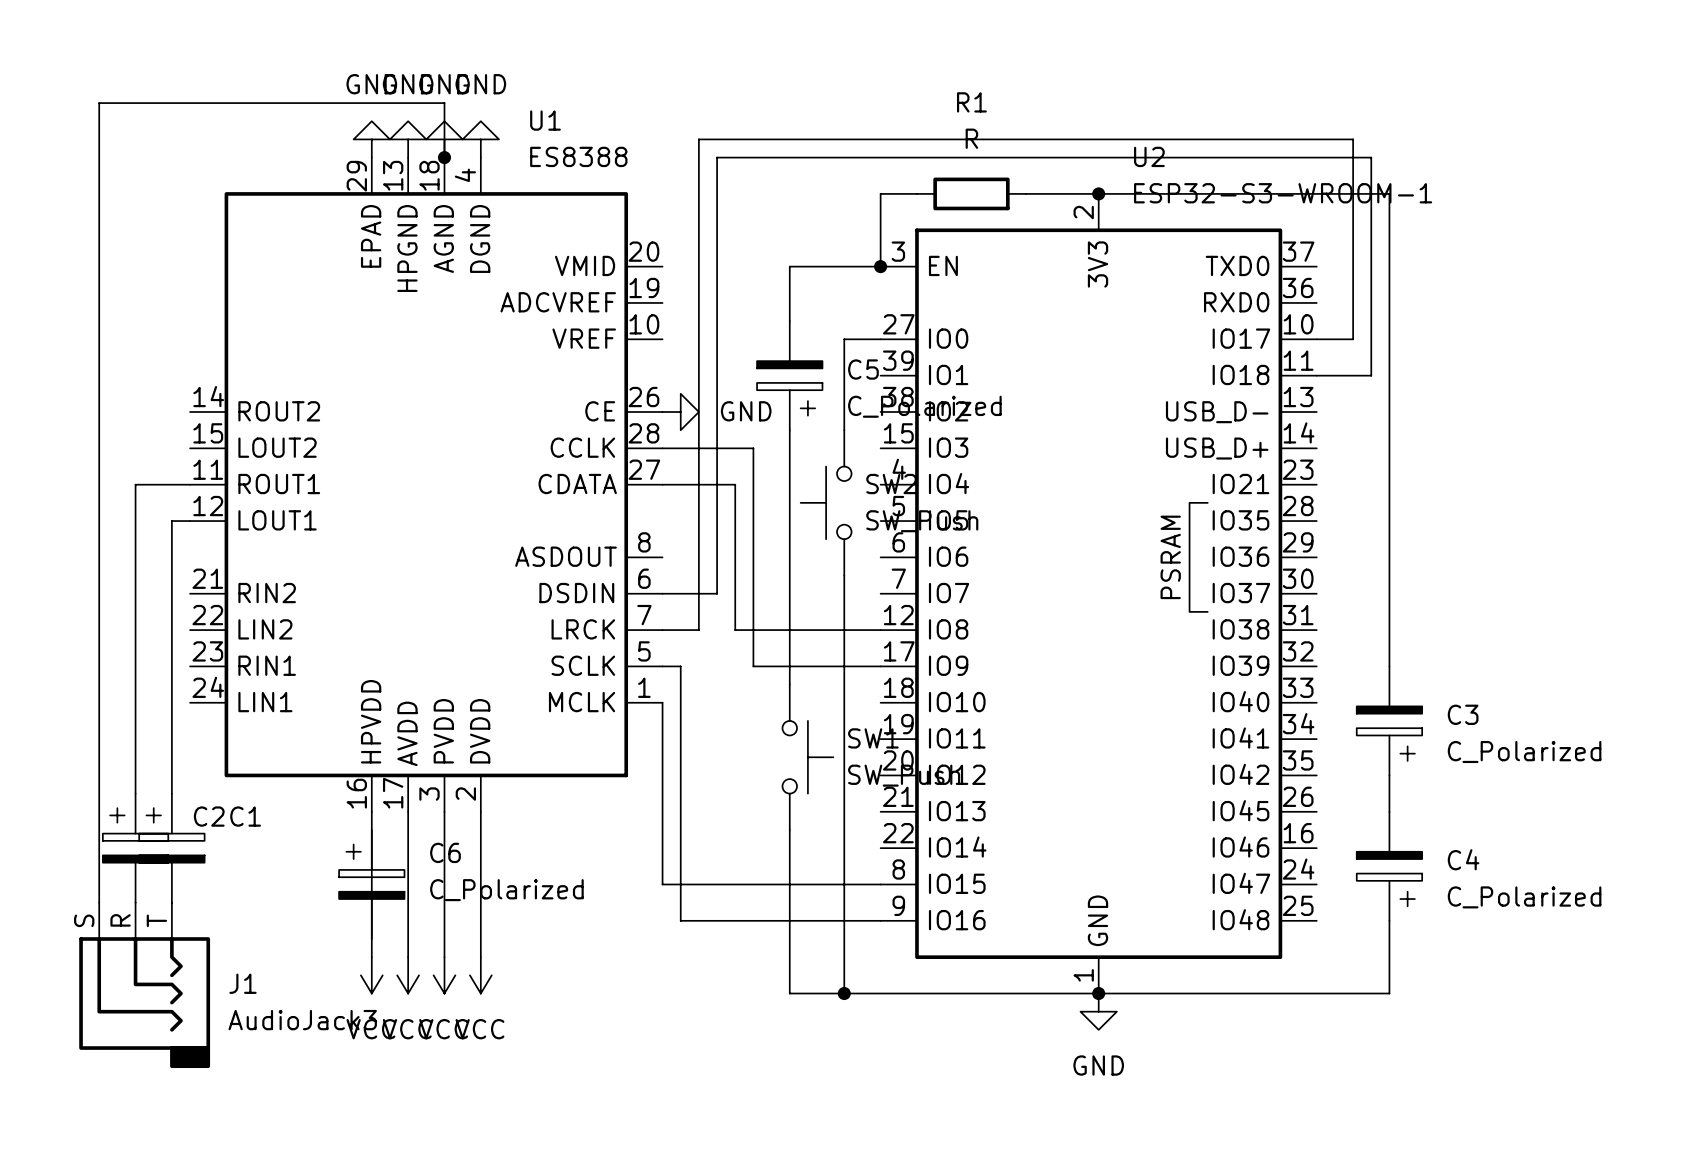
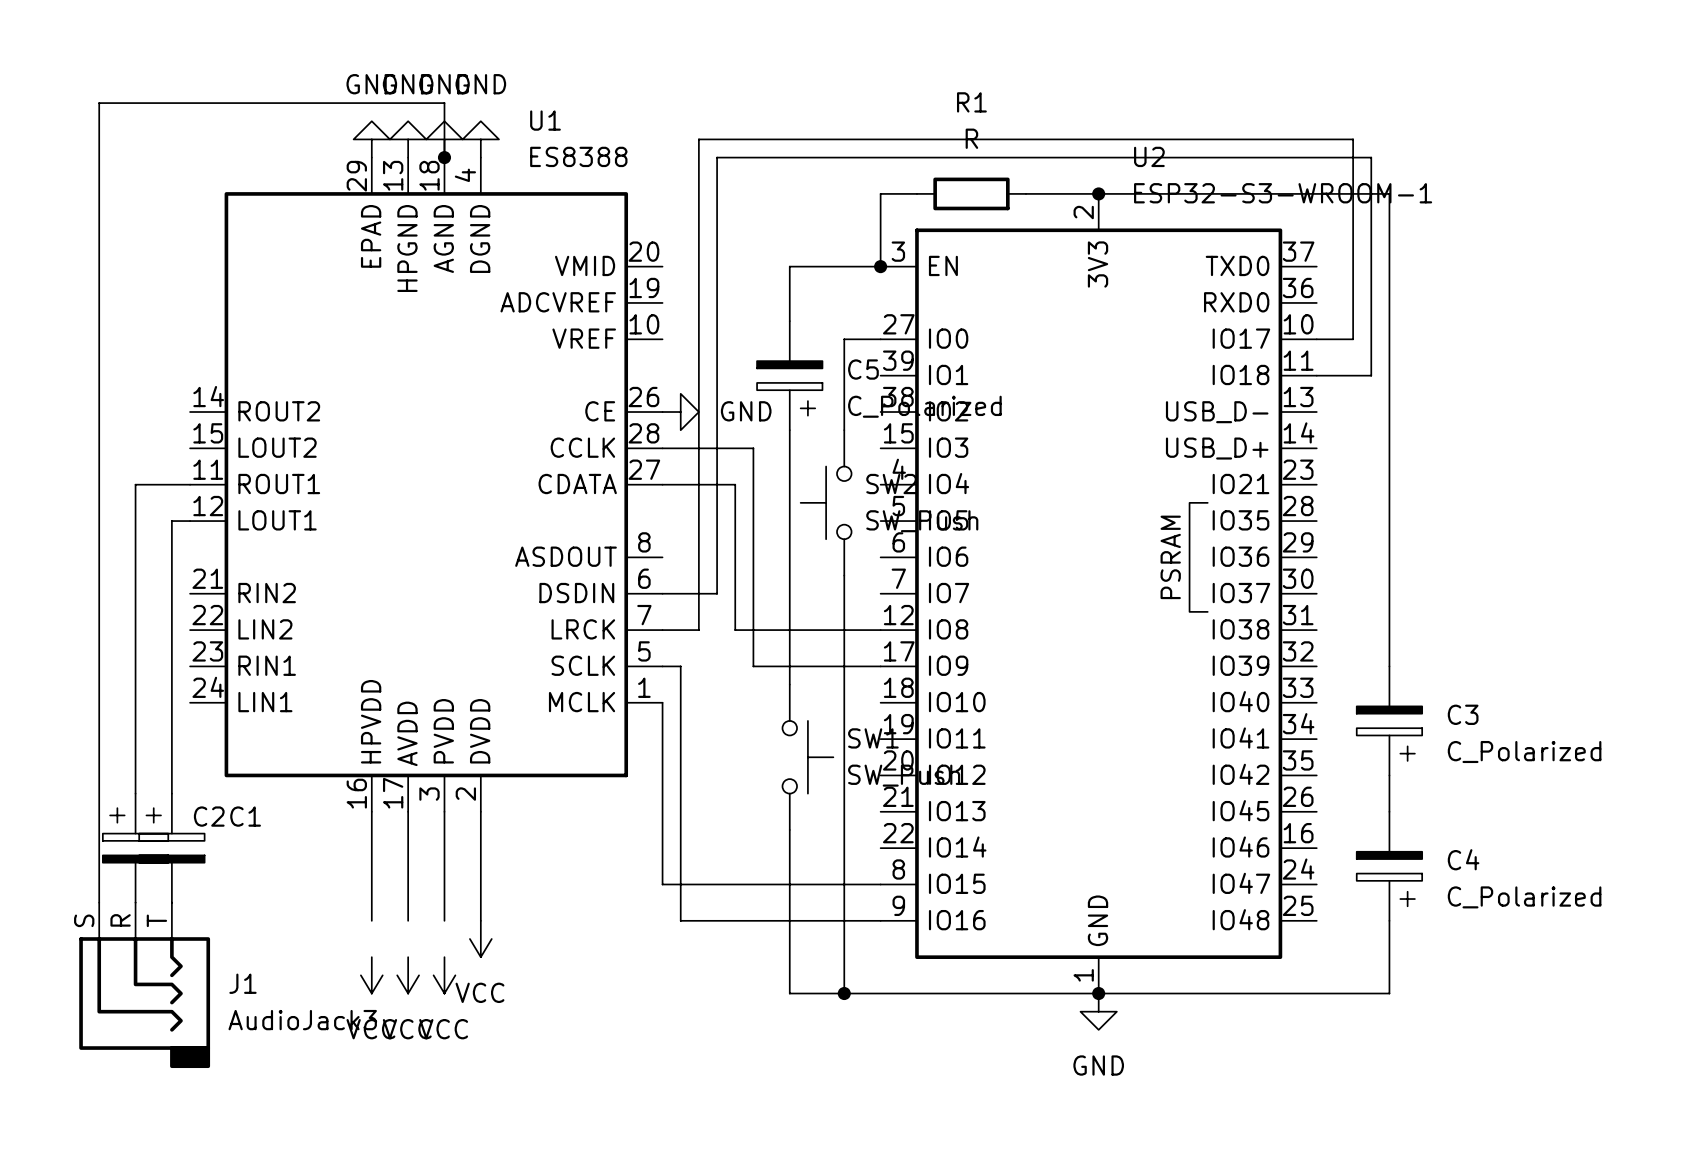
C6: C_Polarized (371, 884) -> none
wire: (371, 920) (371, 957) -> none
wire: (408, 920) (408, 957) -> none
wire: (444, 920) (444, 957) -> none
power symbol position: VCC (480, 975) -> VCC (480, 939)

